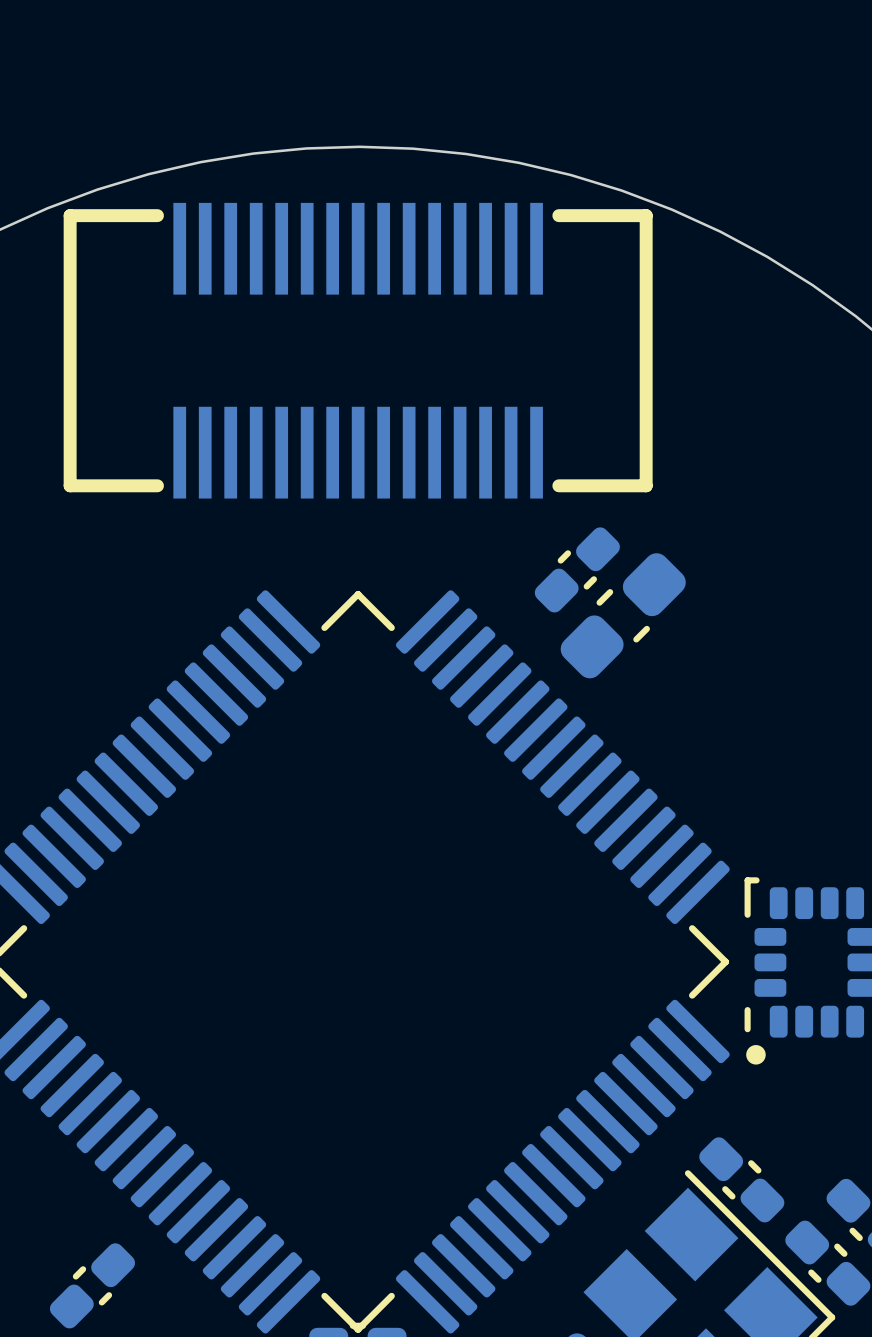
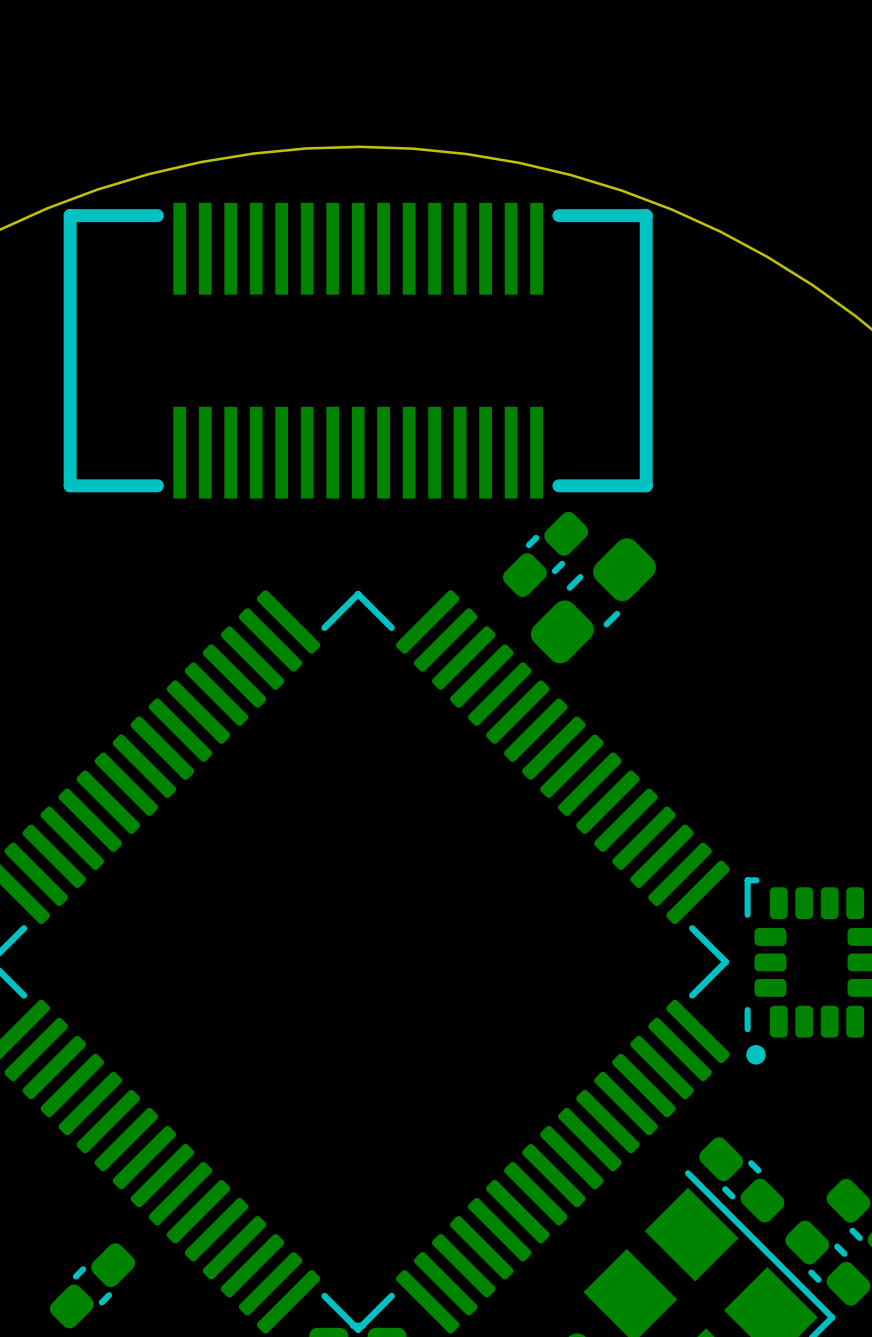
part position: (577, 569) -> (545, 554)
part position: (623, 615) -> (593, 600)

